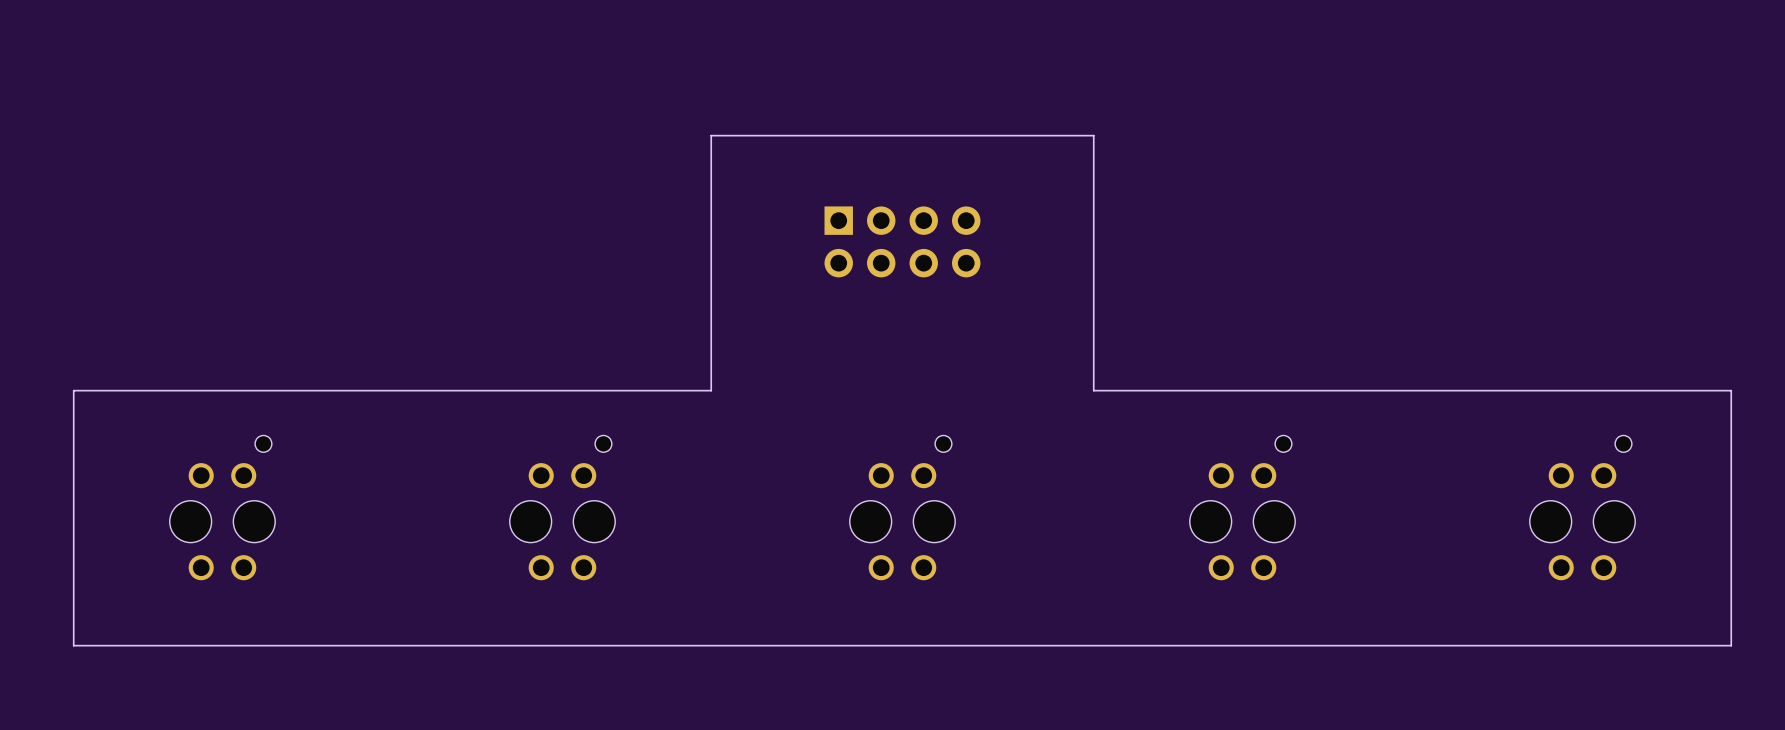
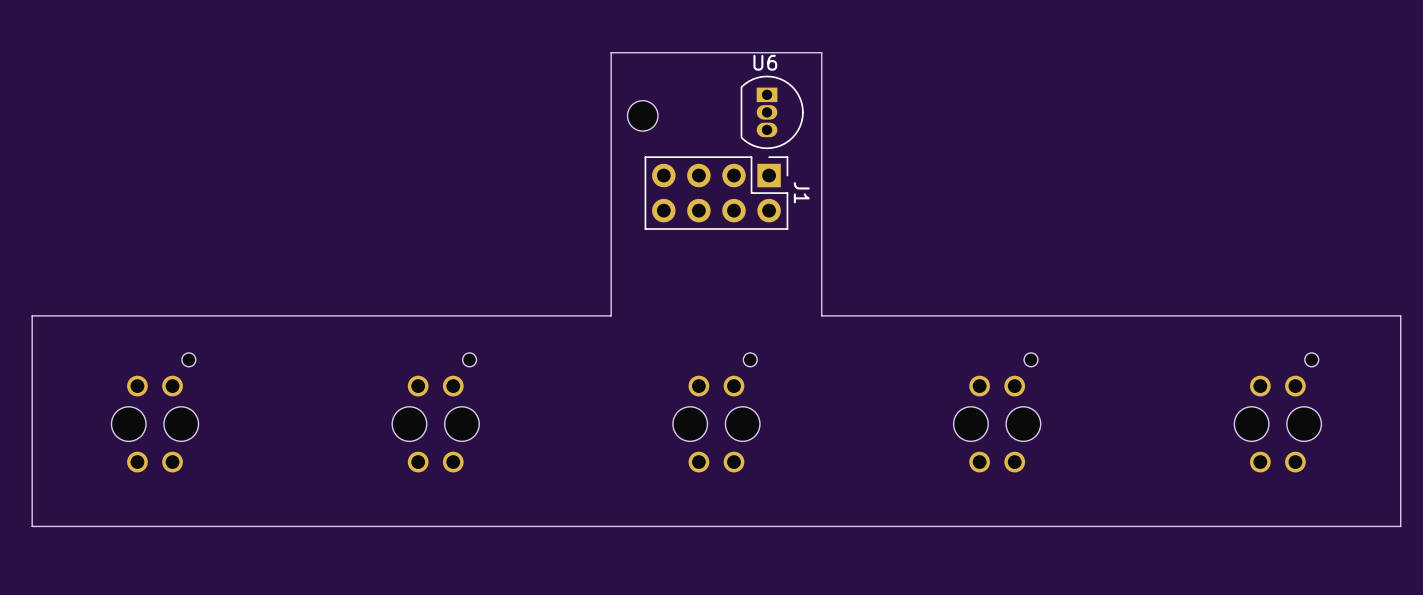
U6: none -> (772, 112)
part: none -> (642, 115)
J1 side: top (902, 241) -> bottom (716, 193)
board edge: (1093, 390) (1093, 135) (711, 135) (711, 390) -> (874, 315) (821, 315) (821, 52) (611, 52) (611, 315) (558, 315)

